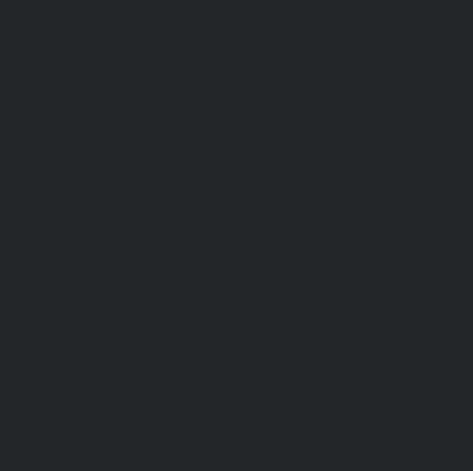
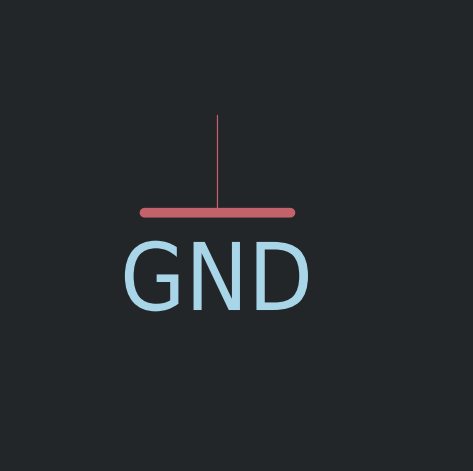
power symbol: none -> GND (217, 166)

